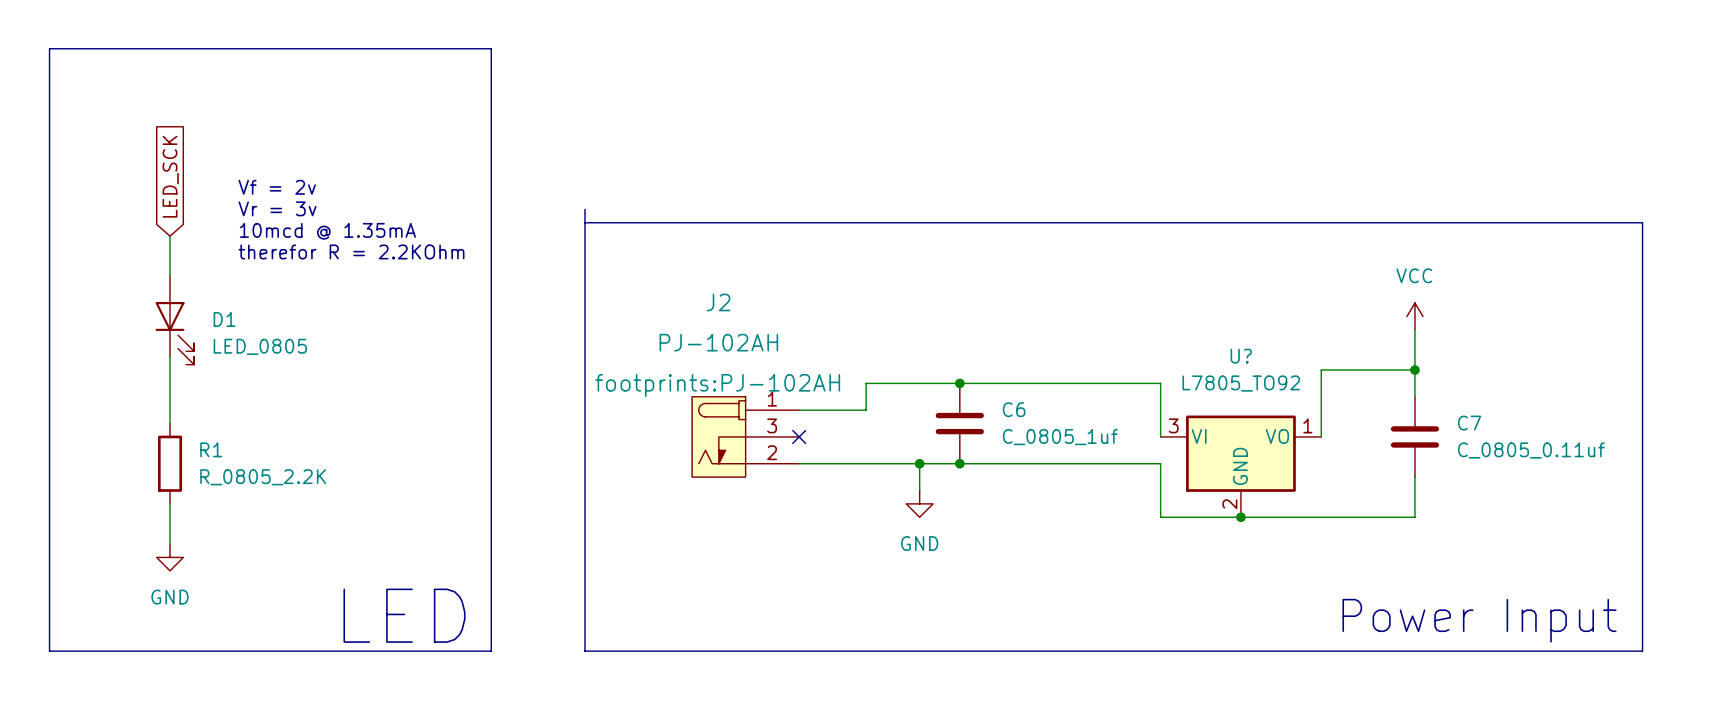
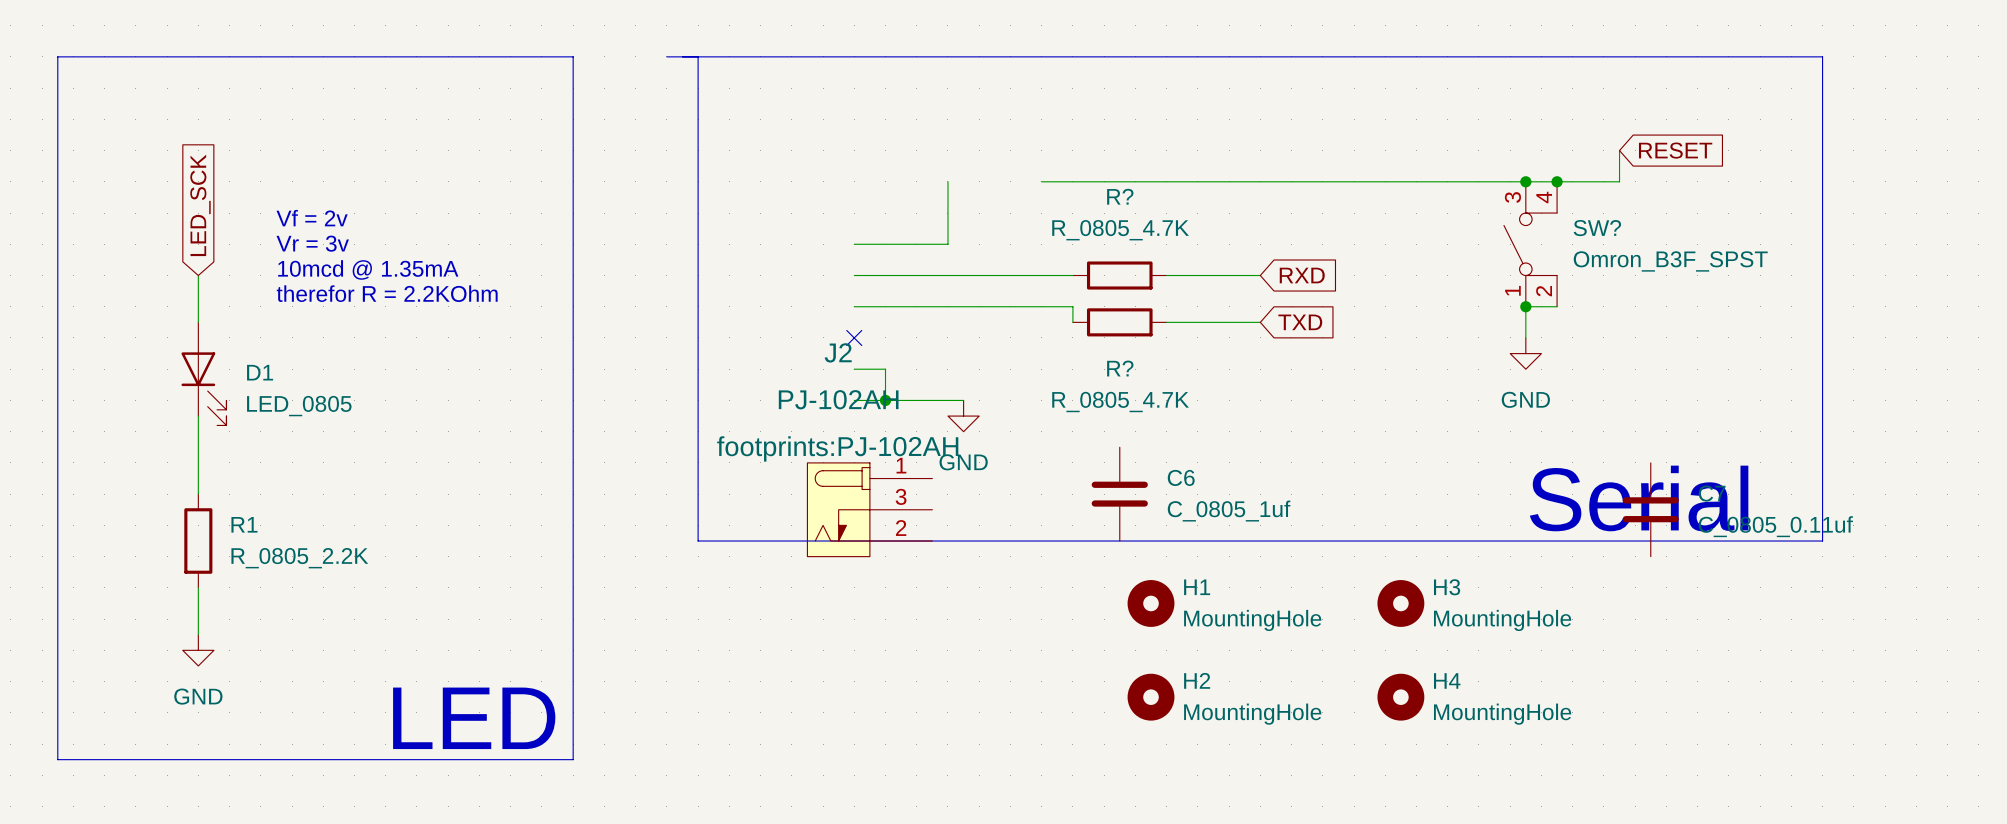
line: none -> (666, 56) (1822, 56) (1822, 541) (698, 541) (698, 56)
wire: none -> (1619, 150) (1619, 181) (1041, 181)
global label: none -> RESET (1675, 150)
wire: none -> (947, 181) (947, 244) (854, 244)
junction: none -> (1525, 181)
junction: none -> (1557, 181)
line: (585, 209) (585, 651) (1642, 651) (1642, 222) (585, 222) -> none
SW?: none -> Omron_B3F_SPST (1530, 244)
wire: none -> (854, 275) (1072, 275)
R?: none -> R_0805_4.7K (1119, 275)
wire: none -> (1166, 275) (1260, 275)
global label: none -> RXD (1302, 275)
wire: none -> (854, 306) (1072, 306) (1072, 322)
junction: none -> (1525, 306)
wire: none -> (1557, 306) (1525, 306) (1525, 337)
R?: none -> R_0805_4.7K (1119, 322)
wire: none -> (1166, 322) (1260, 322)
global label: none -> TXD (1300, 322)
no-connect mark: none -> (854, 337)
power symbol: none -> GND (1525, 353)
wire: none -> (854, 369) (885, 369) (885, 400)
power symbol: VCC (1414, 316) -> none
wire: (1414, 329) (1414, 396) -> none
wire: none -> (854, 400) (963, 400)
junction: none -> (885, 400)
wire: (1414, 370) (1321, 370) (1321, 436) -> none
junction: (1414, 370) -> none
junction: (959, 383) -> none
wire: (799, 410) (866, 410) (866, 383) (1160, 383) (1160, 436) -> none
text: none -> Serial (1639, 498)
no-connect mark: (799, 436) -> none
wire: (799, 463) (1160, 463) (1160, 517) (1414, 517) (1414, 477) -> none
wire: (919, 463) (919, 490) -> none
junction: (919, 463) -> none
junction: (959, 463) -> none
U?: L7805_TO92 (1240, 466) -> none
power symbol position: GND (919, 503) -> GND (963, 416)
H1: none -> MountingHole (1151, 603)
H3: none -> MountingHole (1400, 603)
junction: (1240, 517) -> none
H2: none -> MountingHole (1151, 697)
H4: none -> MountingHole (1400, 697)
text: Power Input (1479, 620) -> none

